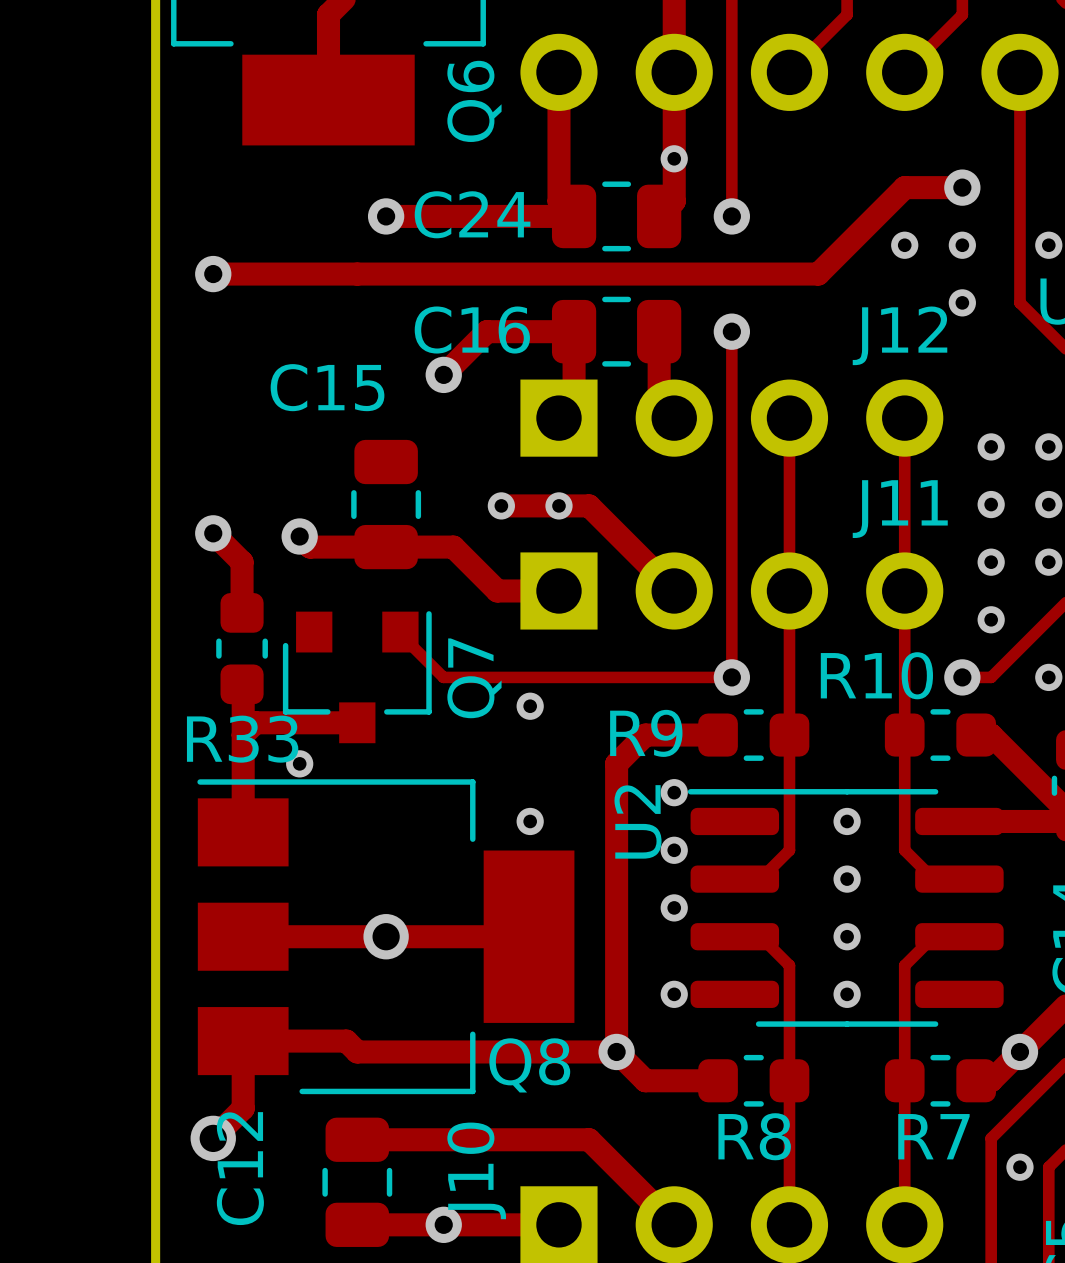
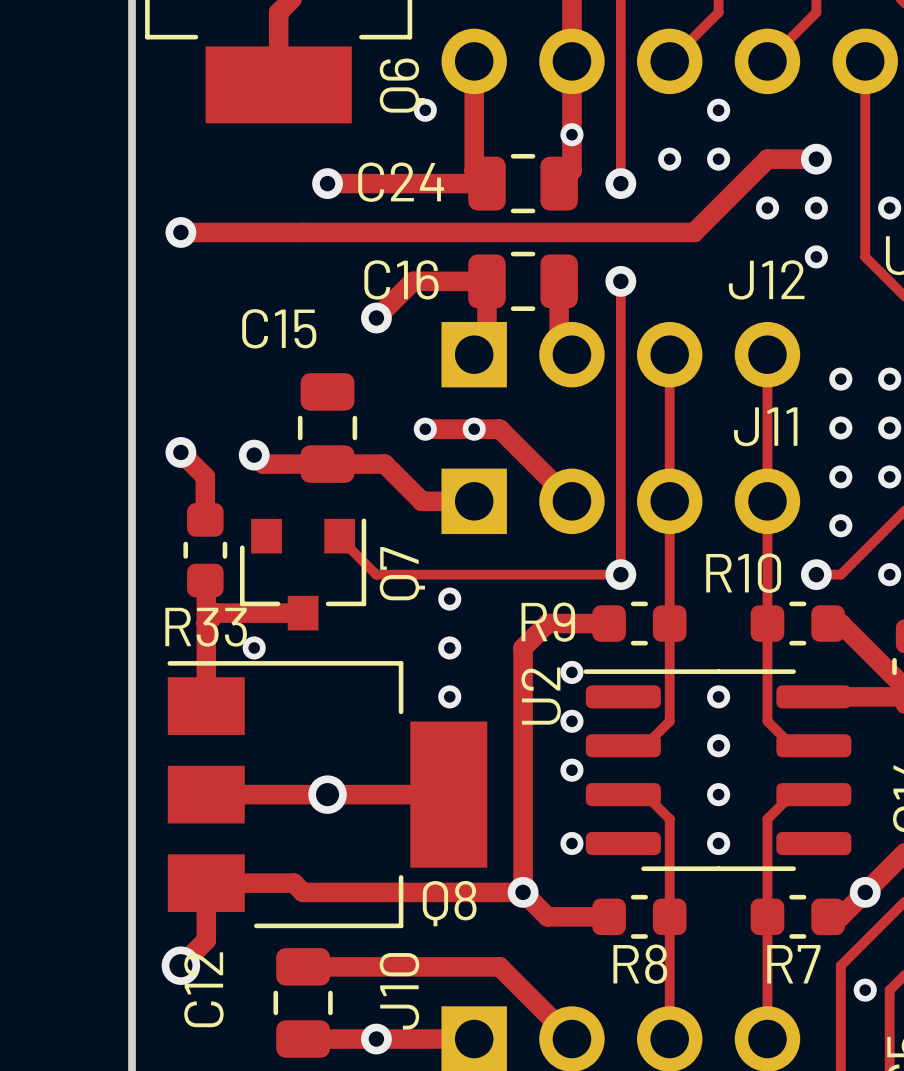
via: none -> (425, 110)
via: none -> (718, 110)
via: none -> (669, 159)
via: none -> (718, 159)
via: none -> (449, 647)

